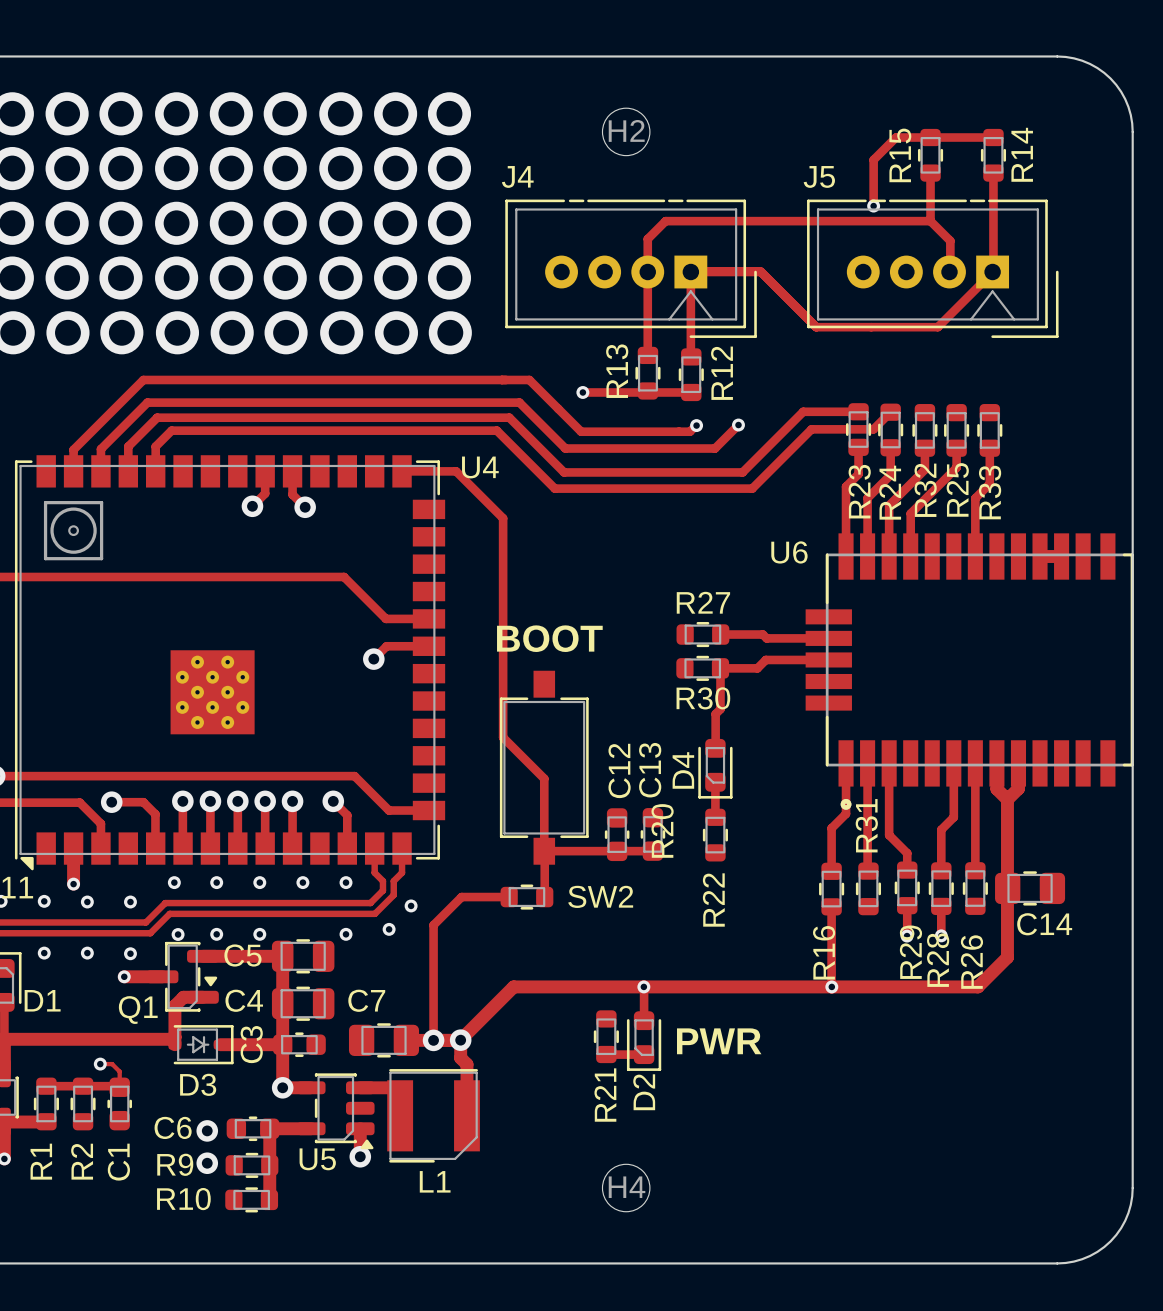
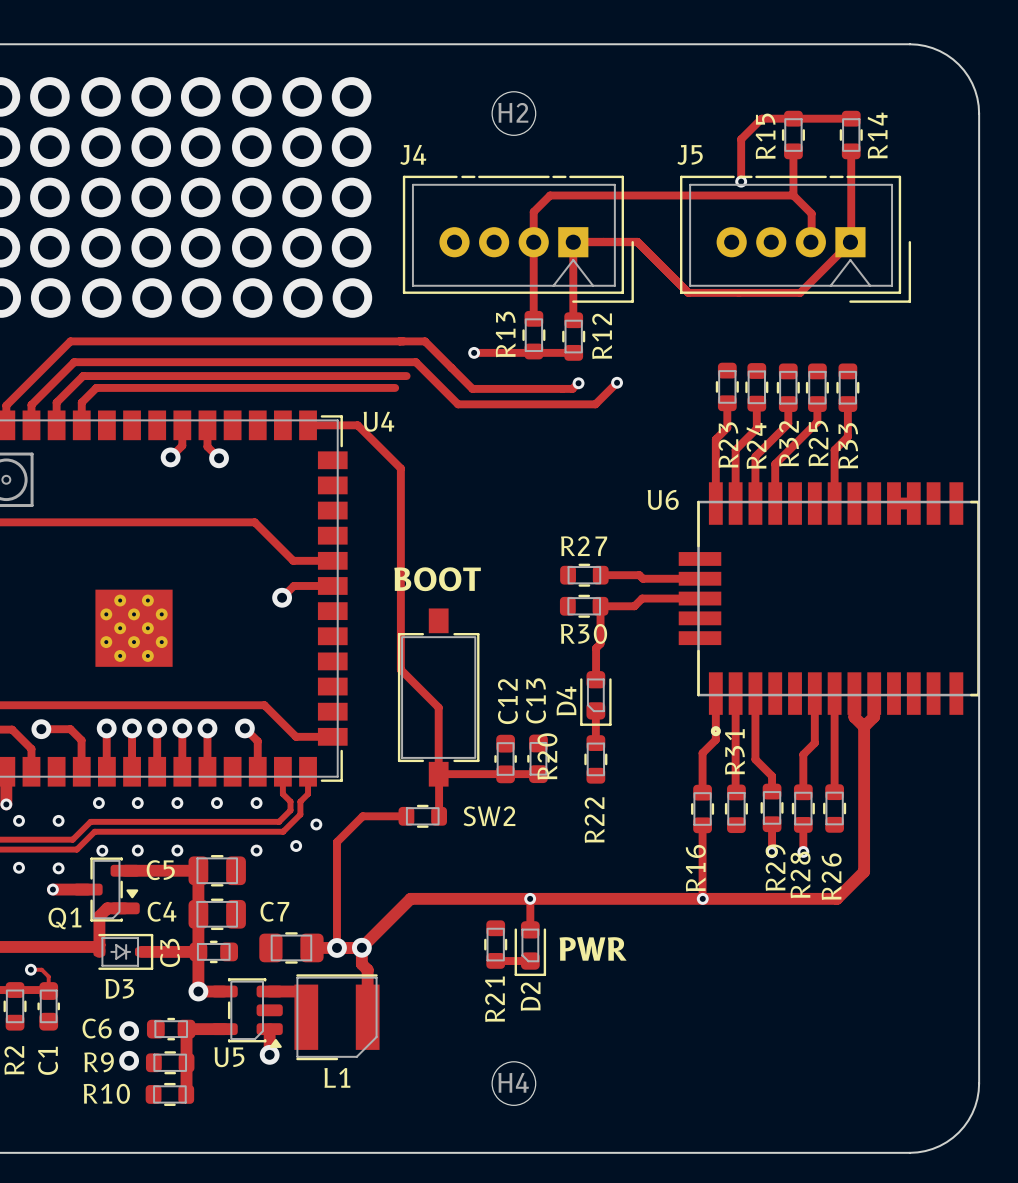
track: (858, 411) (803, 411) (742, 472) (564, 472) (509, 417) -> none
track: (890, 412) (873, 429) (811, 429) (752, 488) (554, 488) (496, 430) -> none
C14: (1030, 888) -> none

